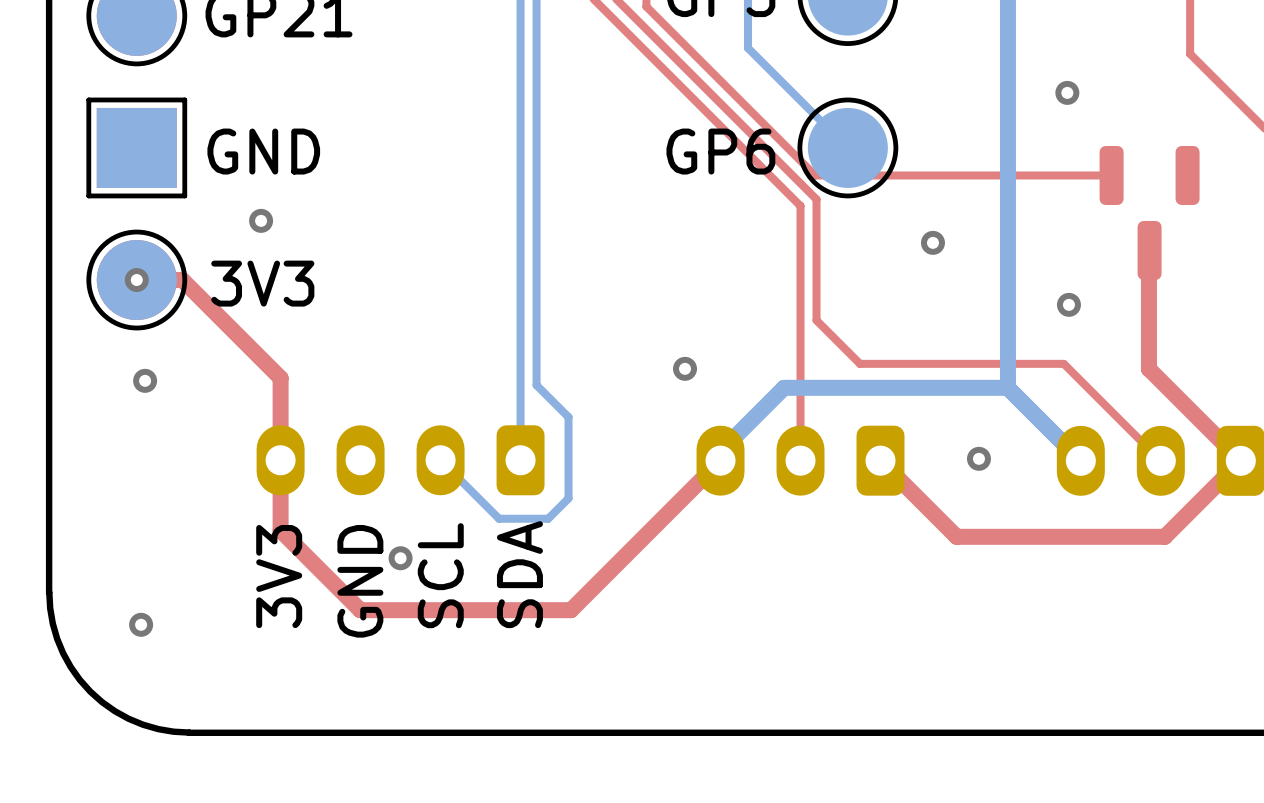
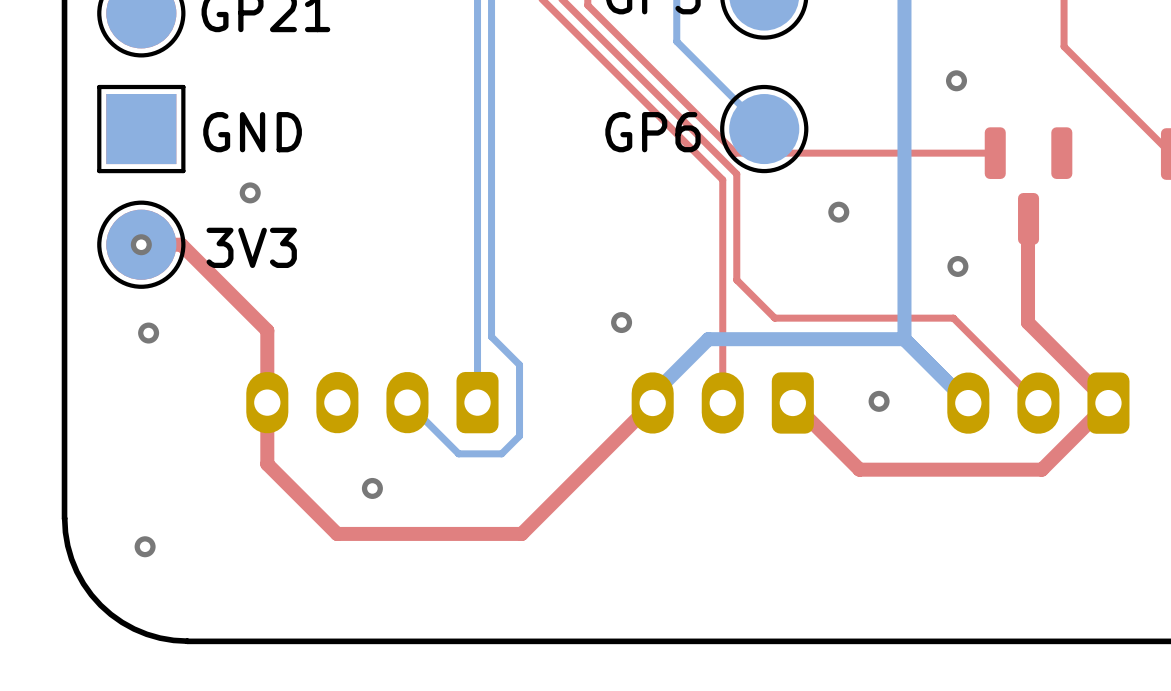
text: SDA (519, 574) -> none
text: SCL (440, 575) -> none
text: 3V3 (279, 576) -> none
text: GND (360, 581) -> none

